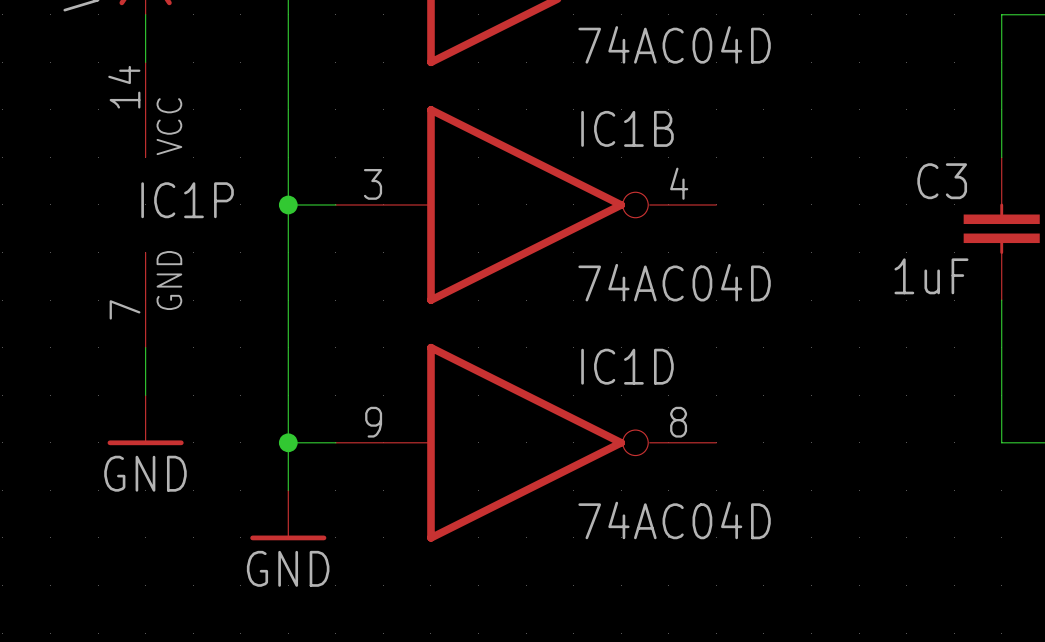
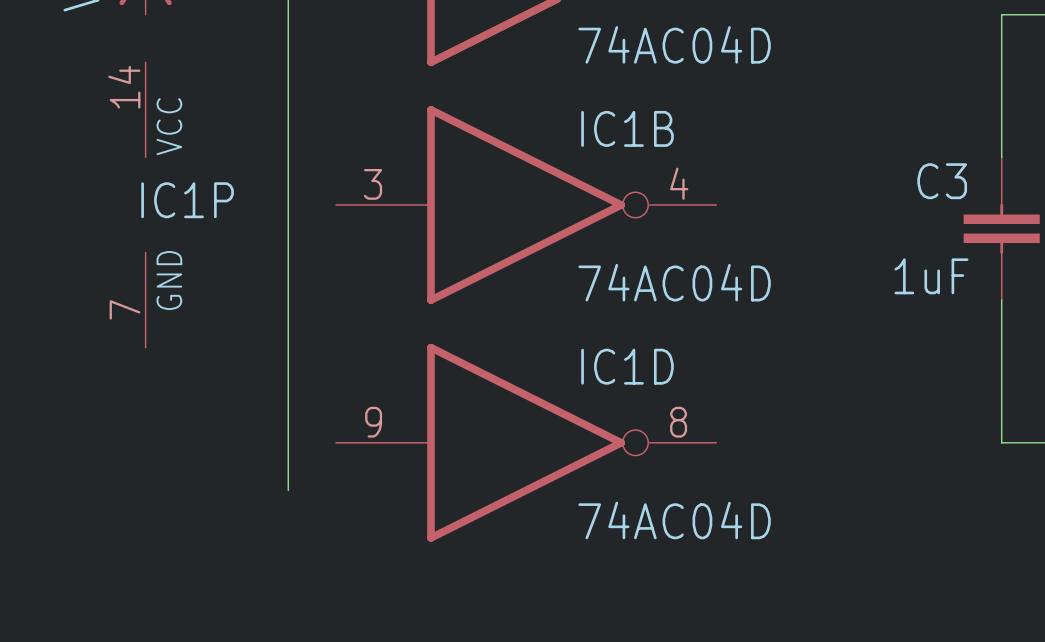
wire: (145, 14) (145, 62) -> none
wire: (288, 204) (335, 204) -> none
junction: (288, 204) -> none
wire: (145, 347) (145, 395) -> none
power symbol: GND (145, 420) -> none
wire: (288, 442) (335, 442) -> none
junction: (288, 442) -> none
power symbol: GND (288, 515) -> none

